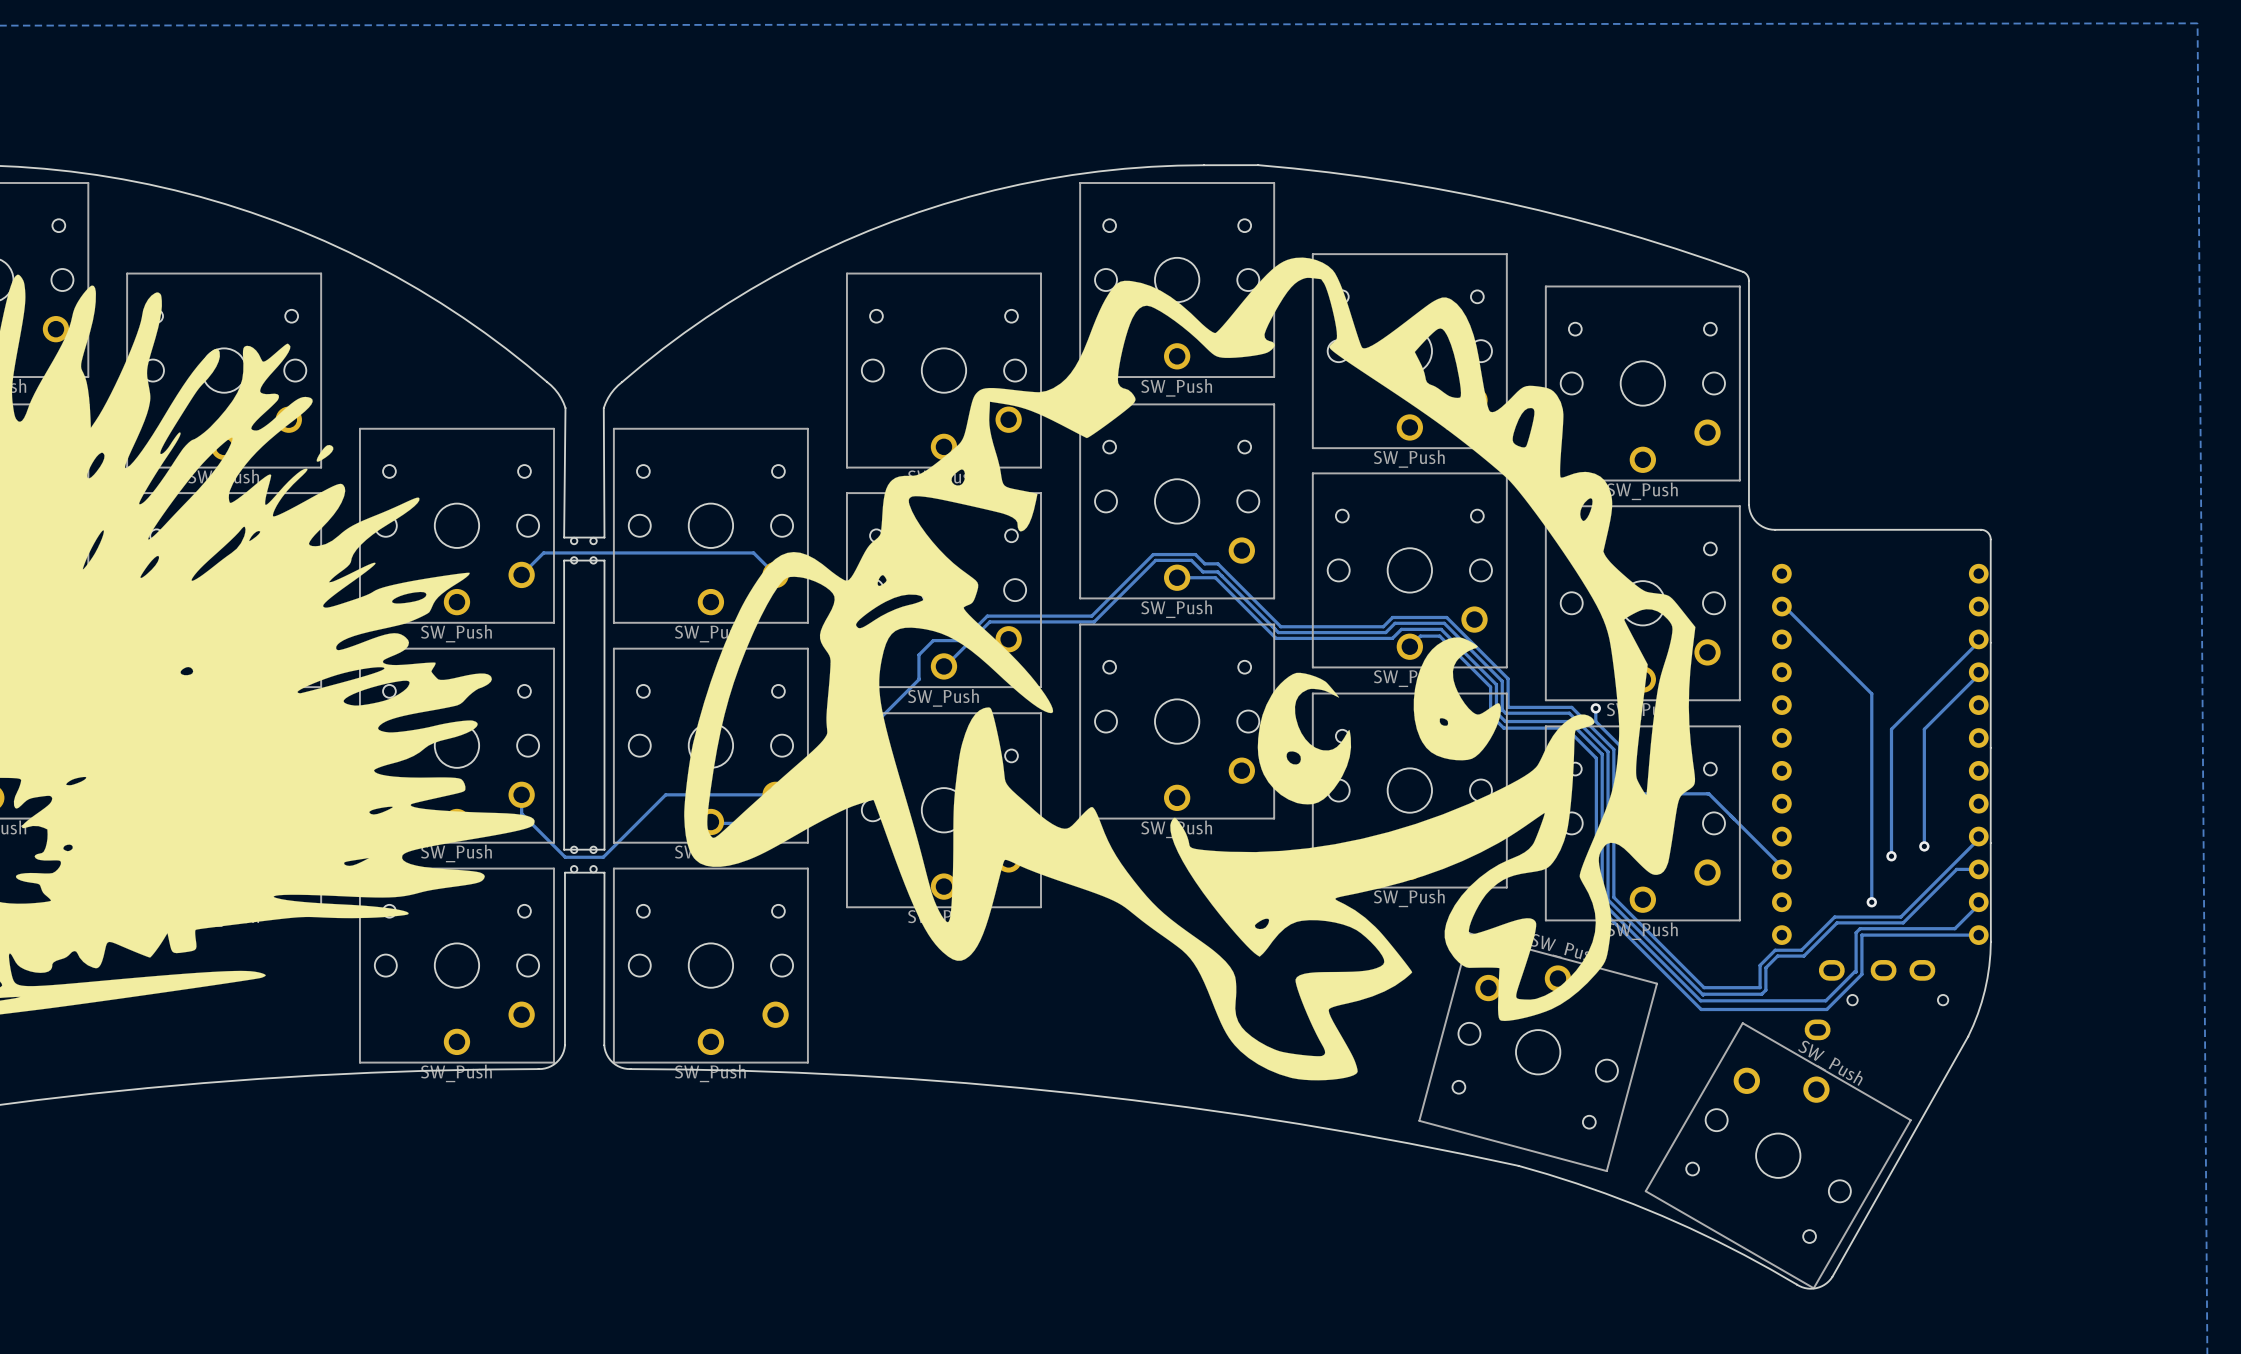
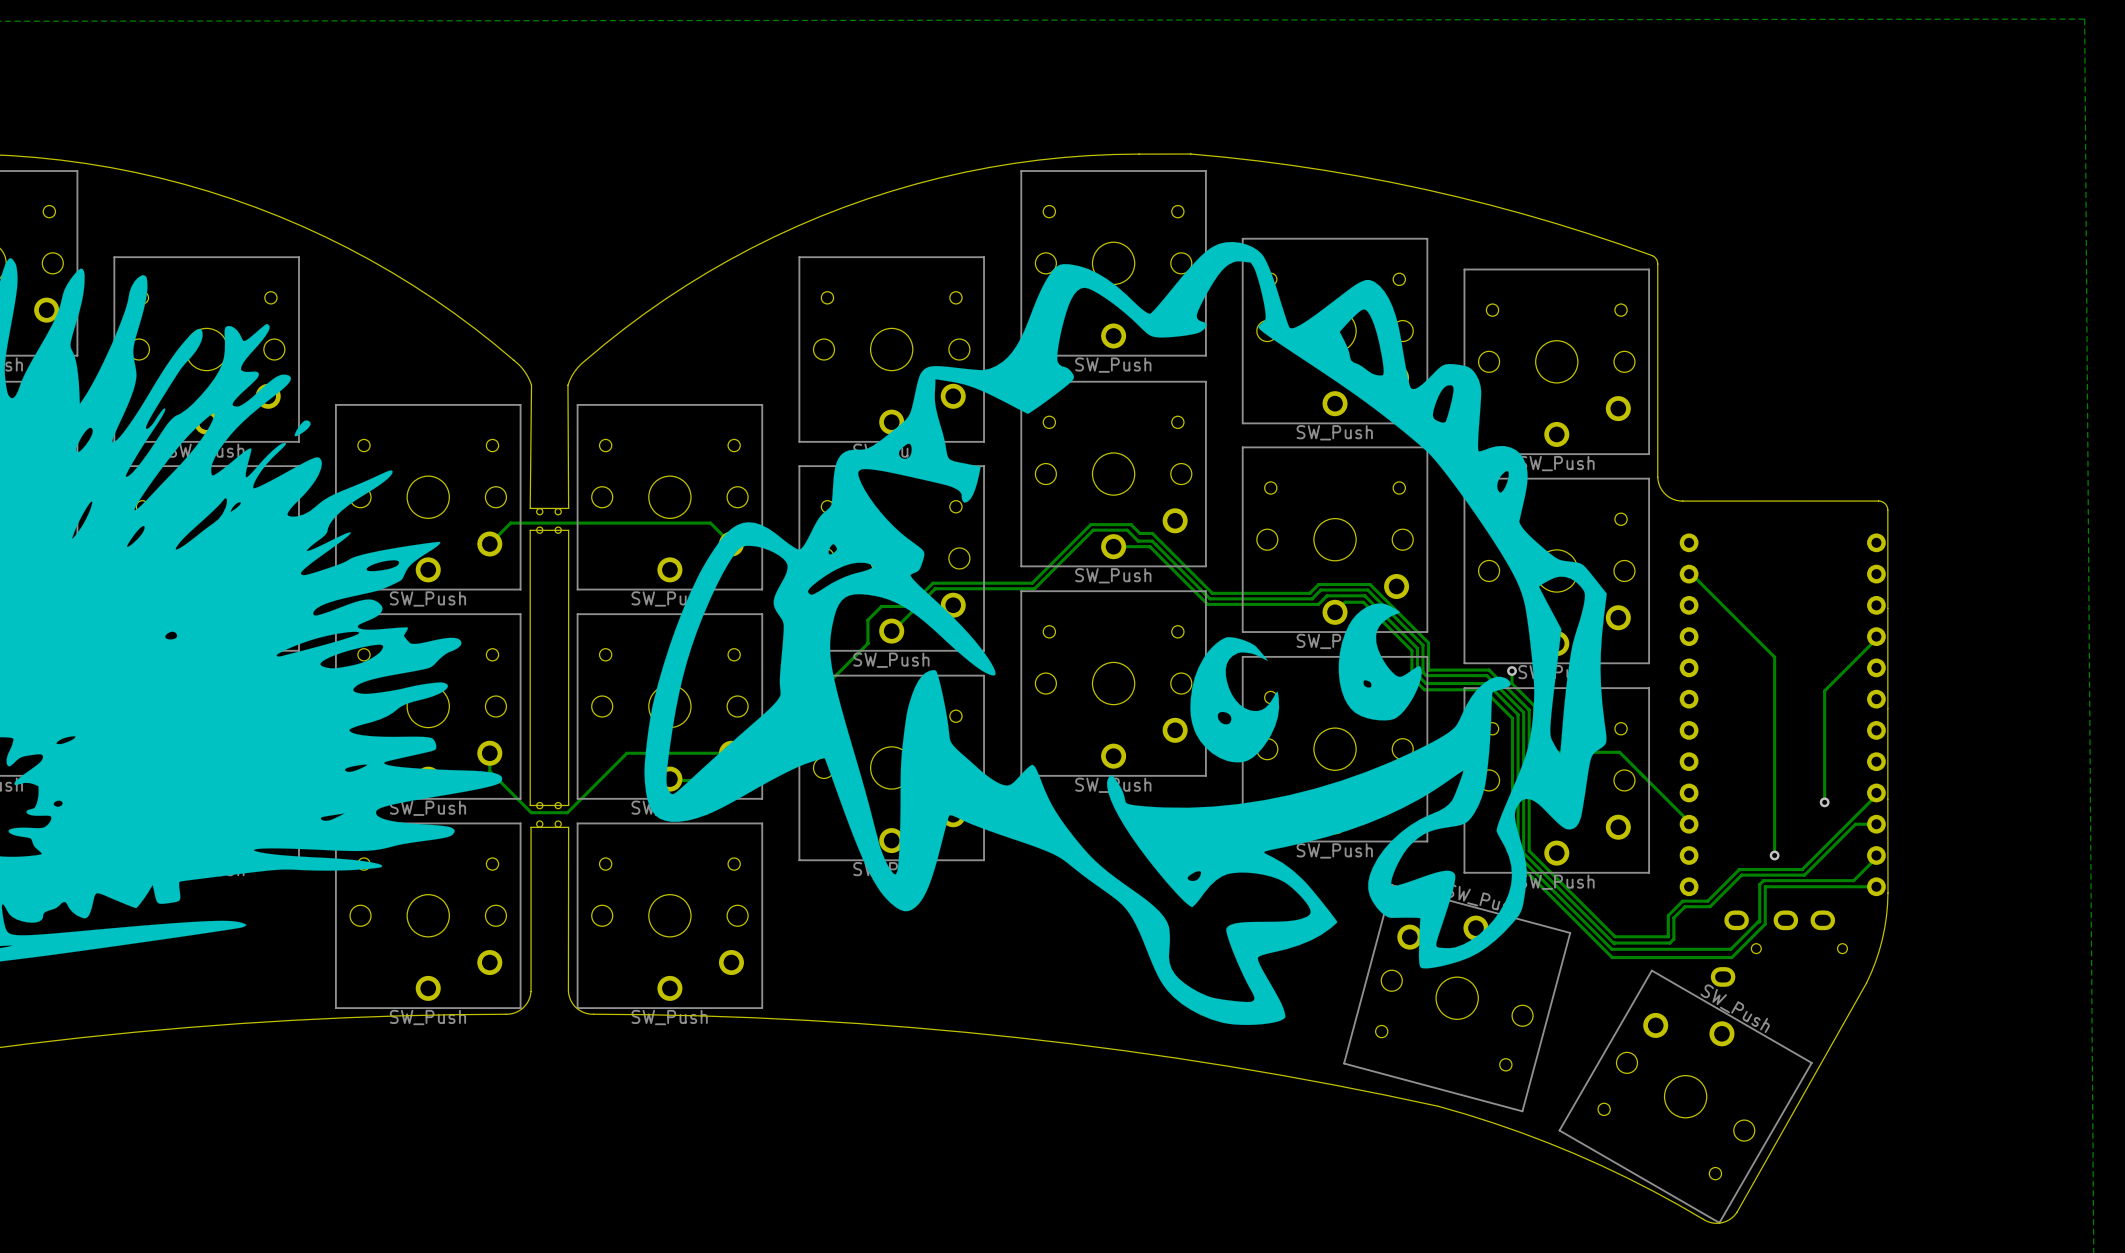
track: (1981, 639) (1891, 729) (1891, 856) -> none
via: (1891, 856) -> none

